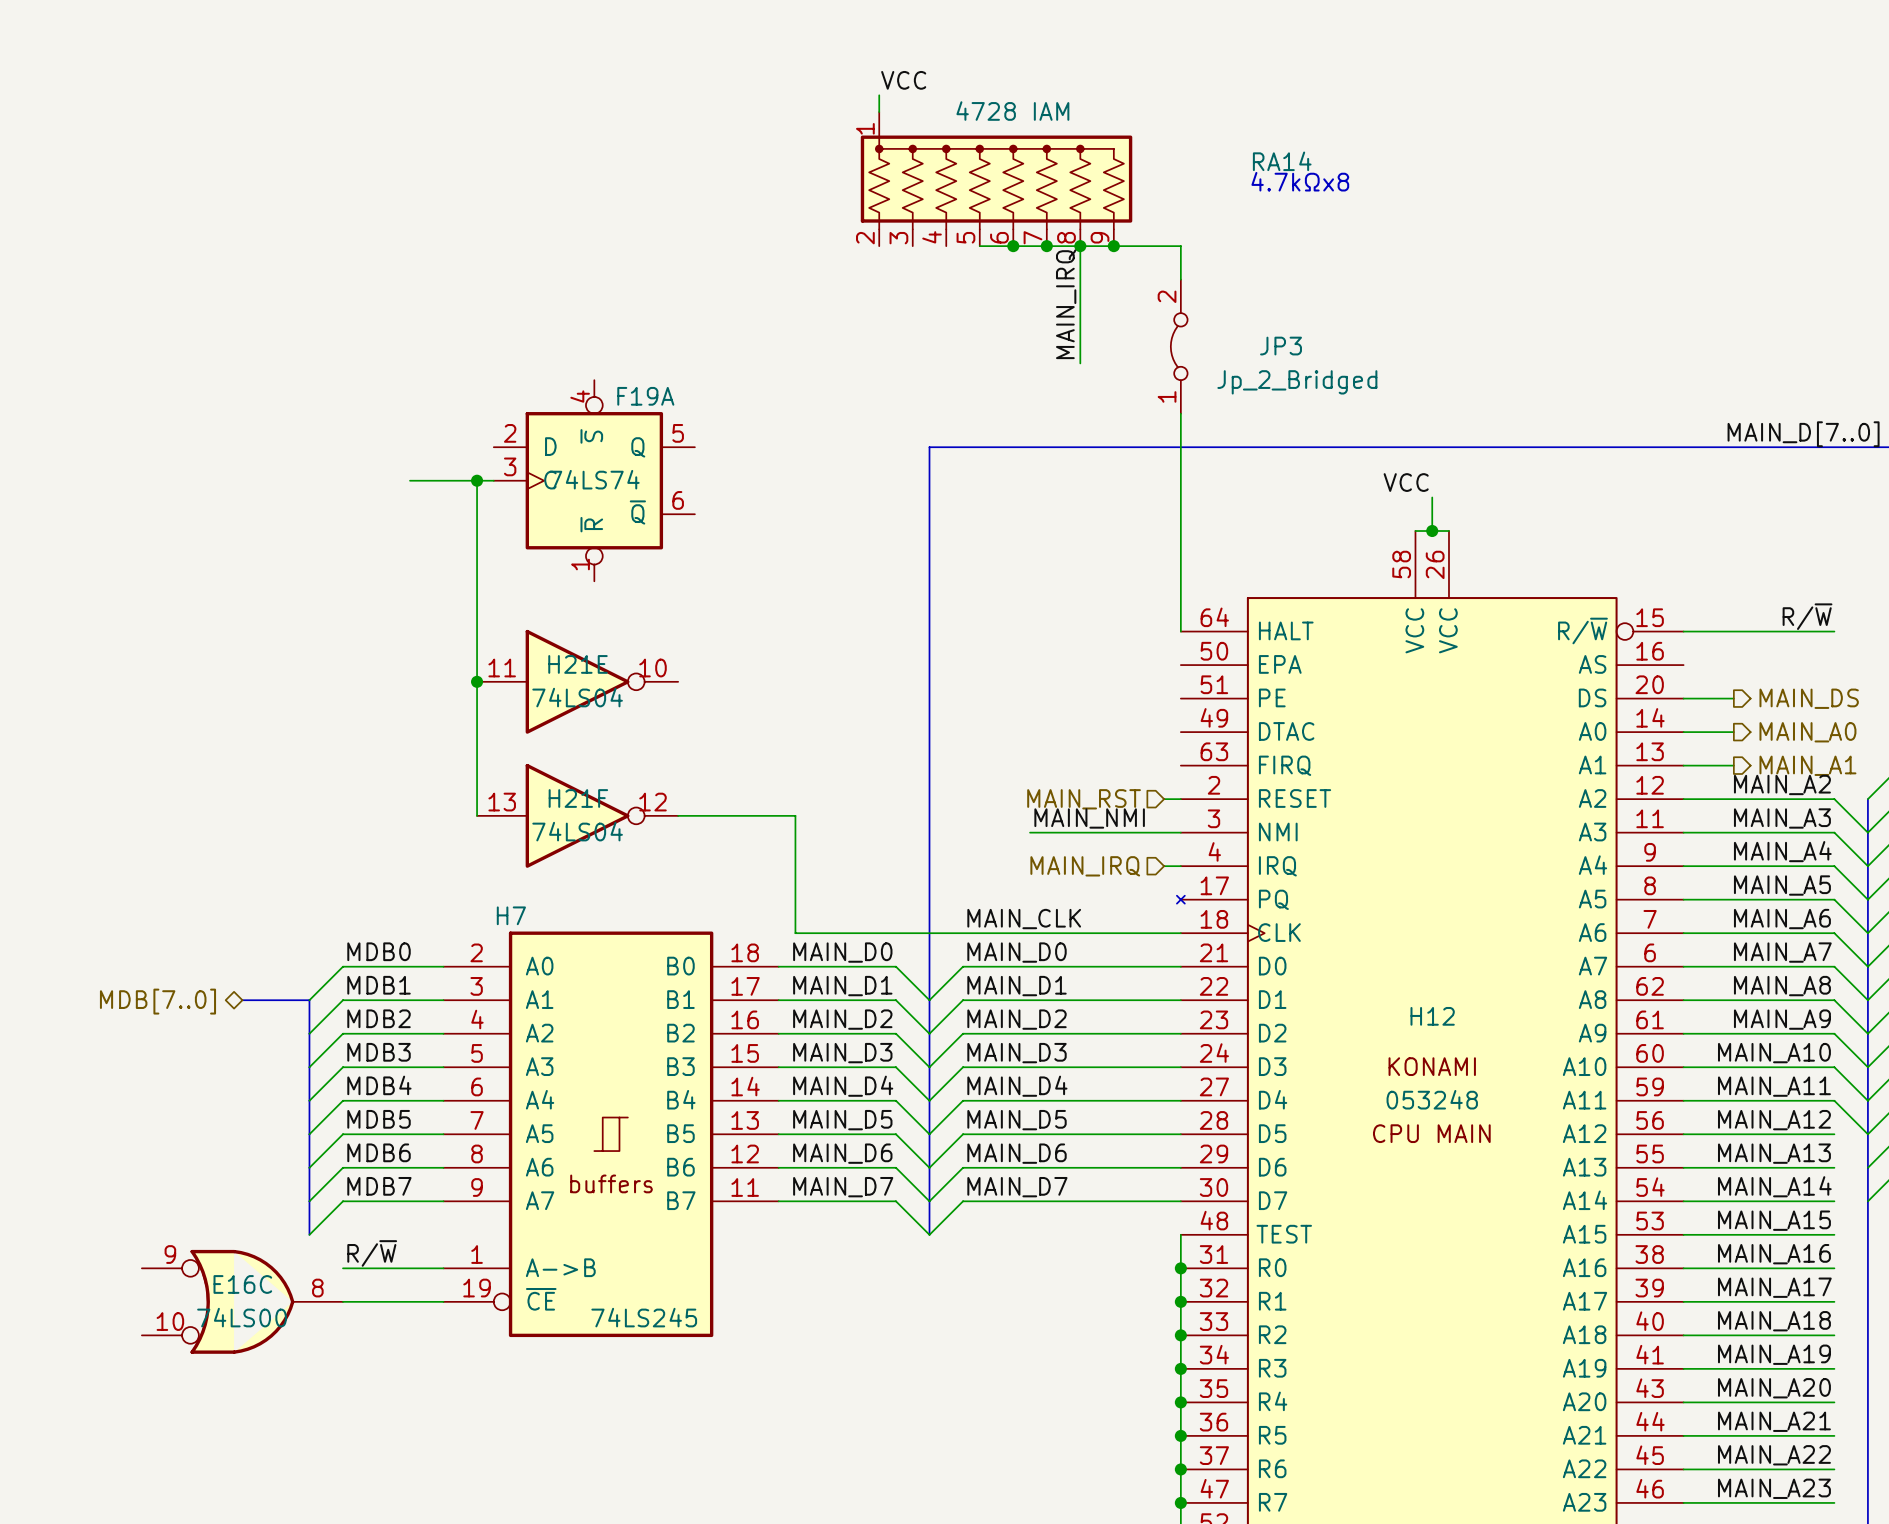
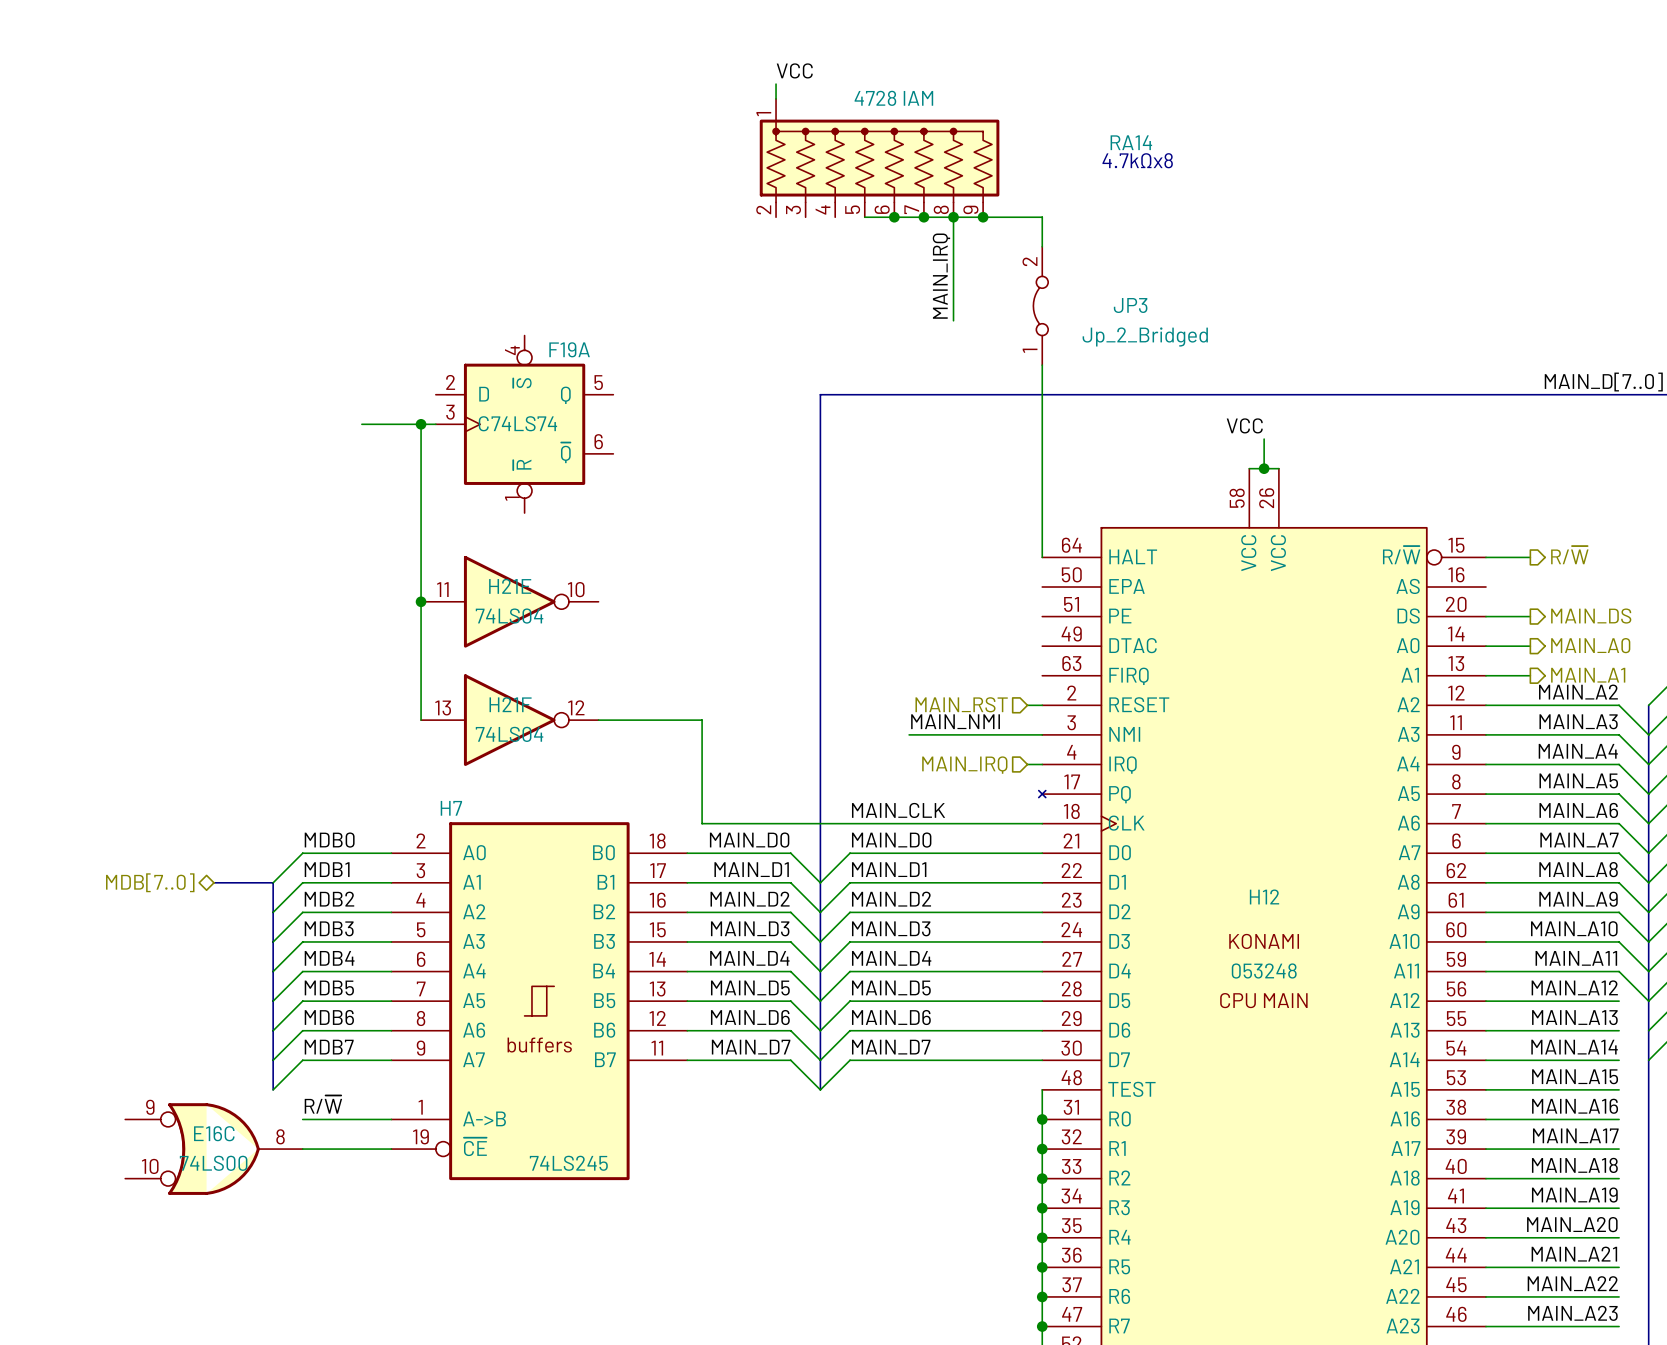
label: R/~{W} (1807, 616) -> none
hierarchical label: none -> R/~{W} (1569, 555)
wire: (1733, 631) (1834, 631) -> none

